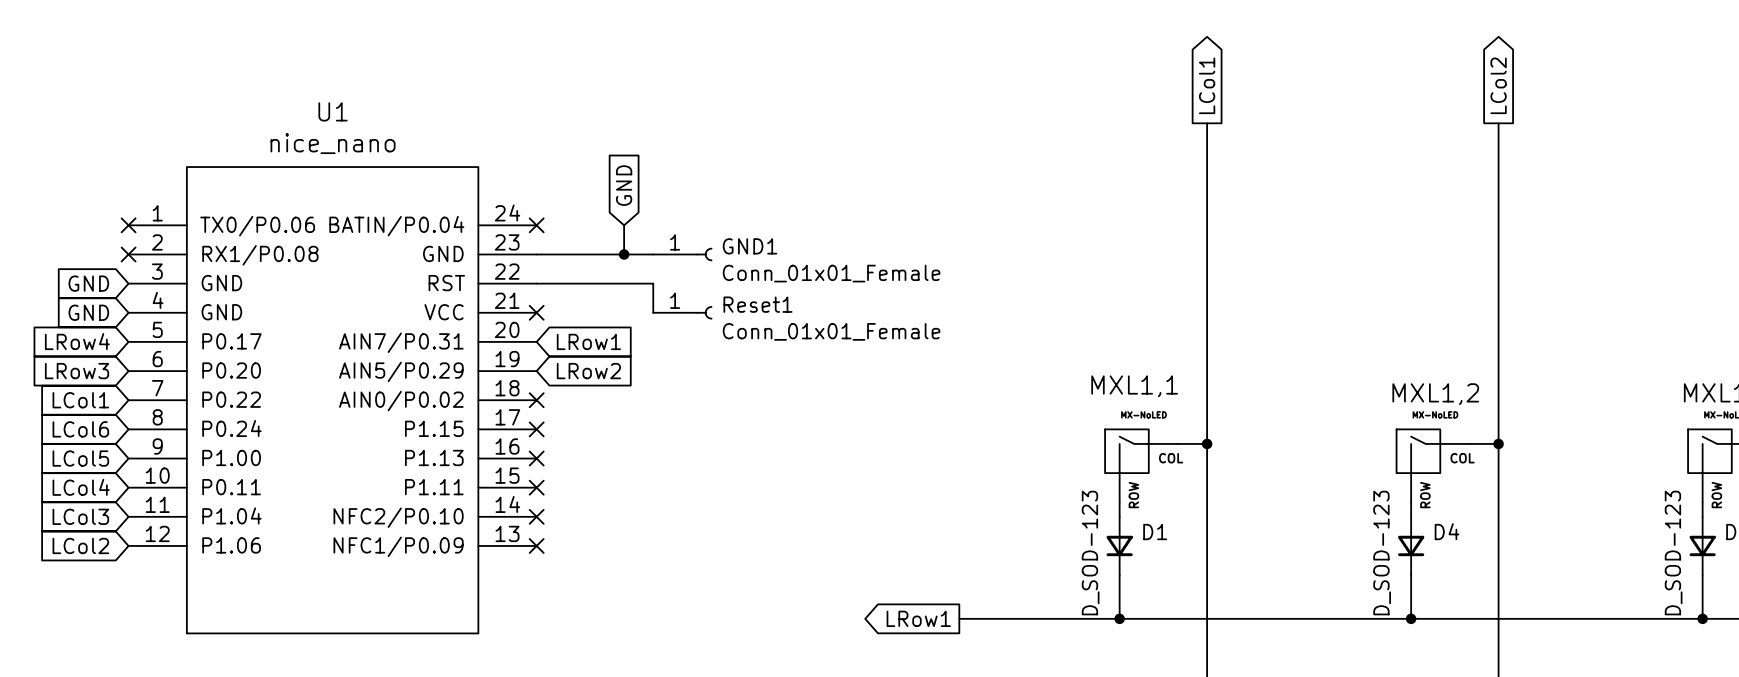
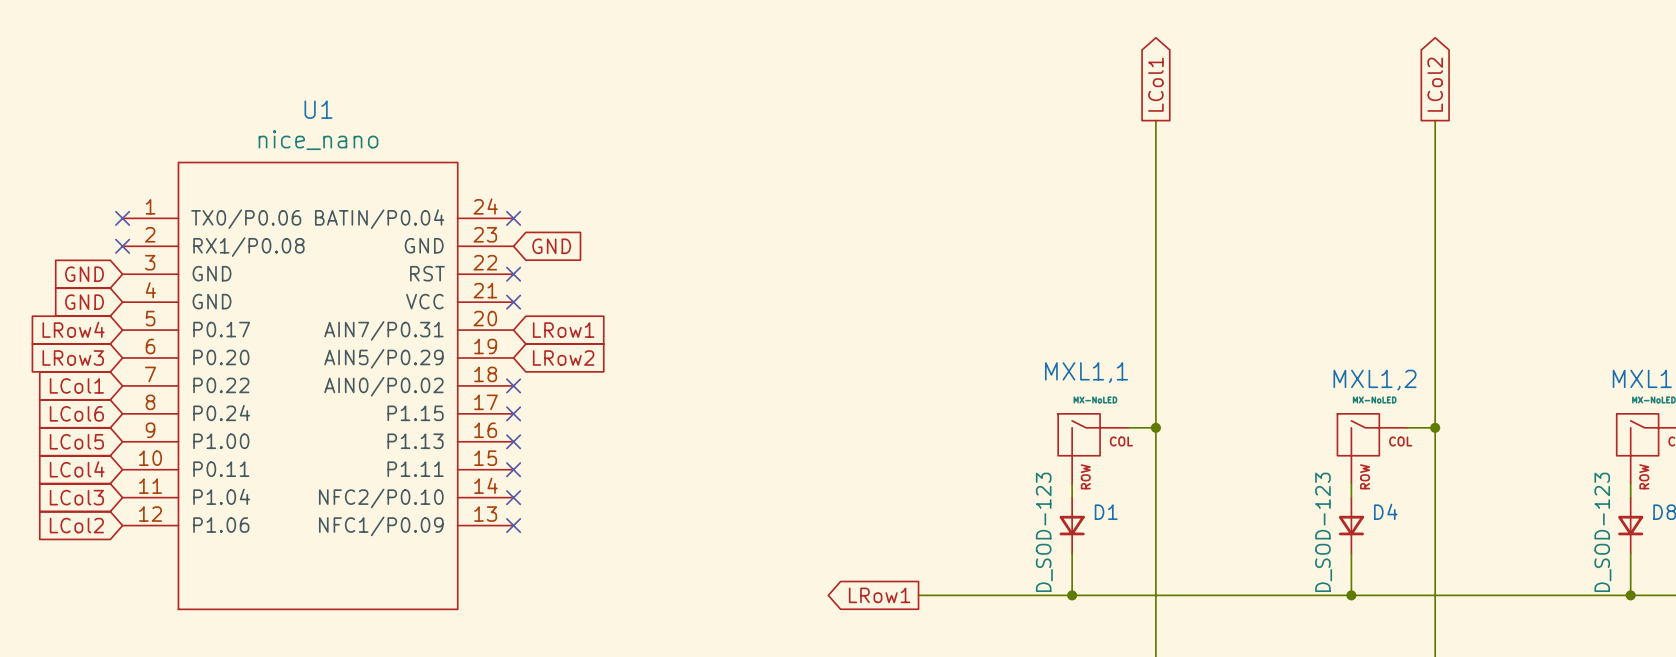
global label rotation: 0° (624, 185) -> 90° clockwise (551, 246)
wire: (624, 225) (624, 254) -> none
wire: (536, 254) (653, 254) -> none
junction: (624, 254) -> none
GND1: Conn_01x01_Female (682, 254) -> none
wire: (536, 283) (653, 283) (653, 312) -> none
no-connect mark: none -> (513, 274)
Reset1: Conn_01x01_Female (682, 312) -> none

